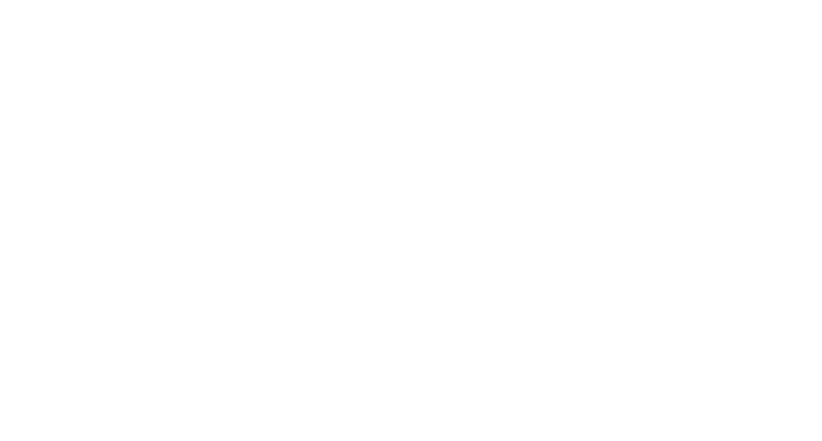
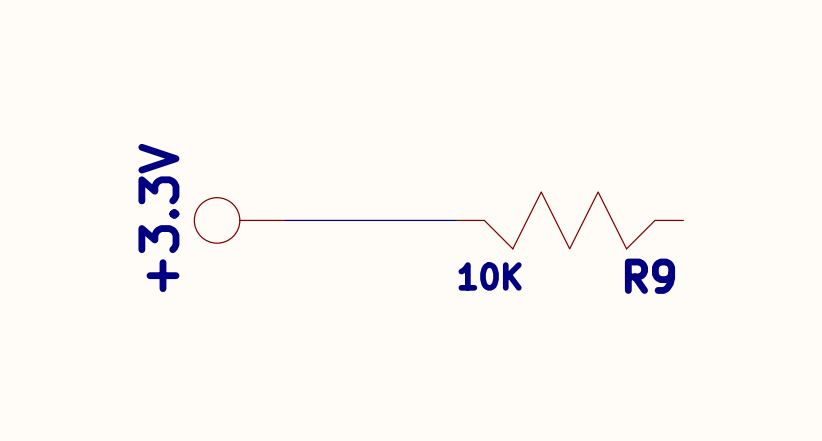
power symbol: none -> +3.3V (239, 220)
wire: none -> (285, 220) (455, 220)
R9: none -> 10K (569, 220)

